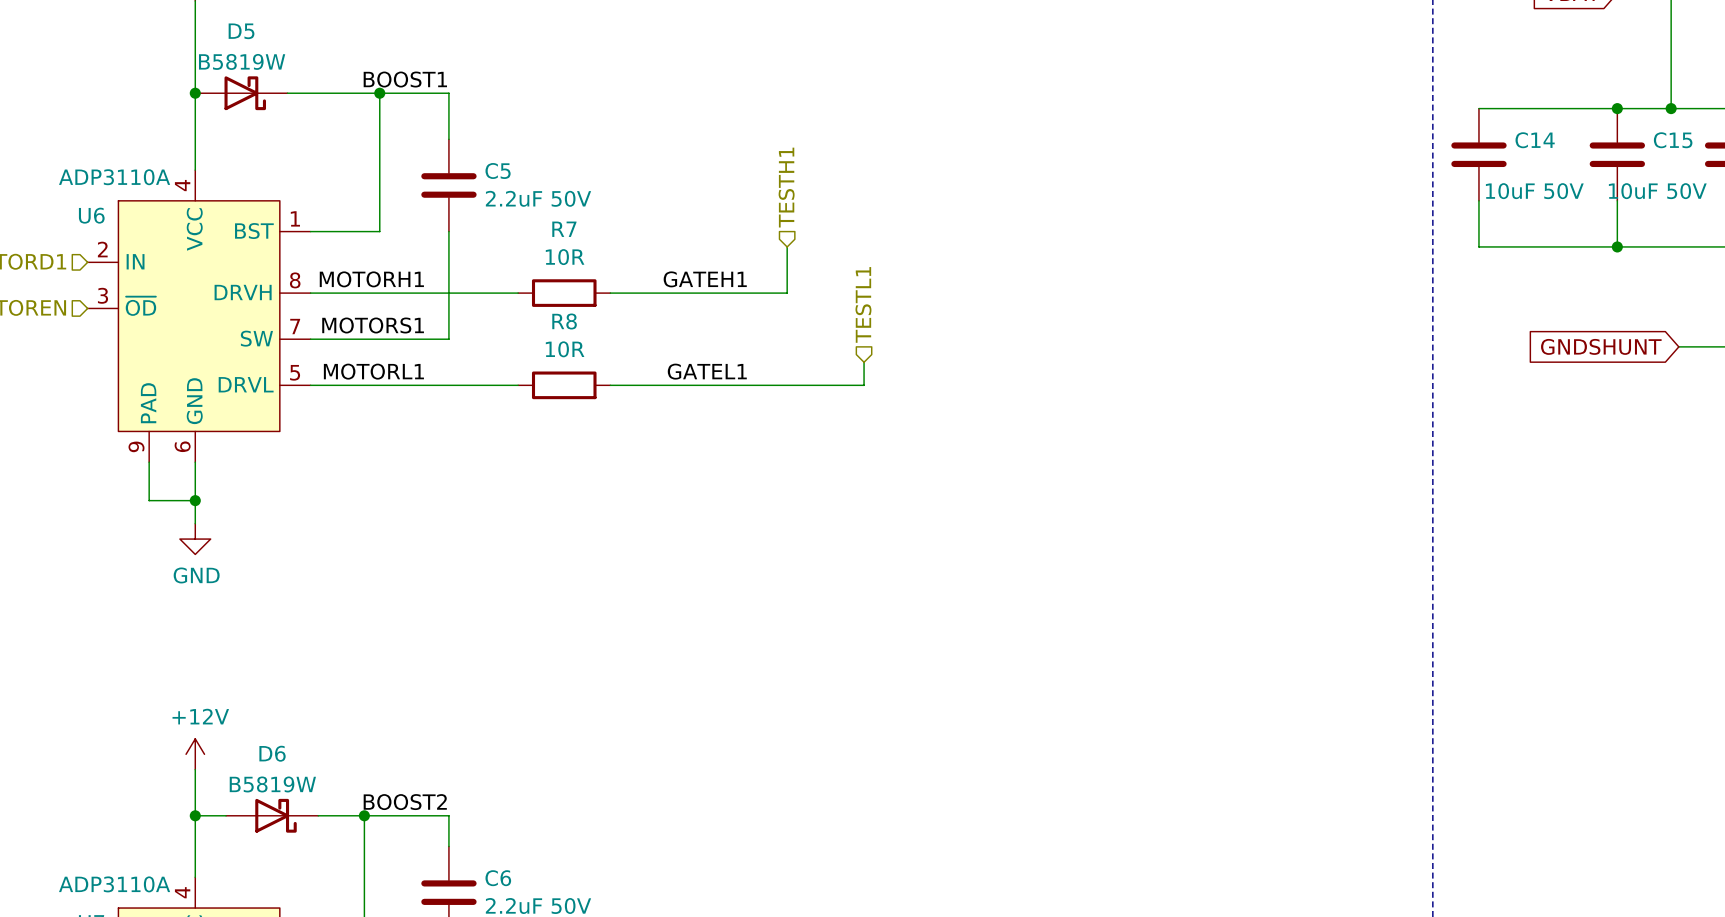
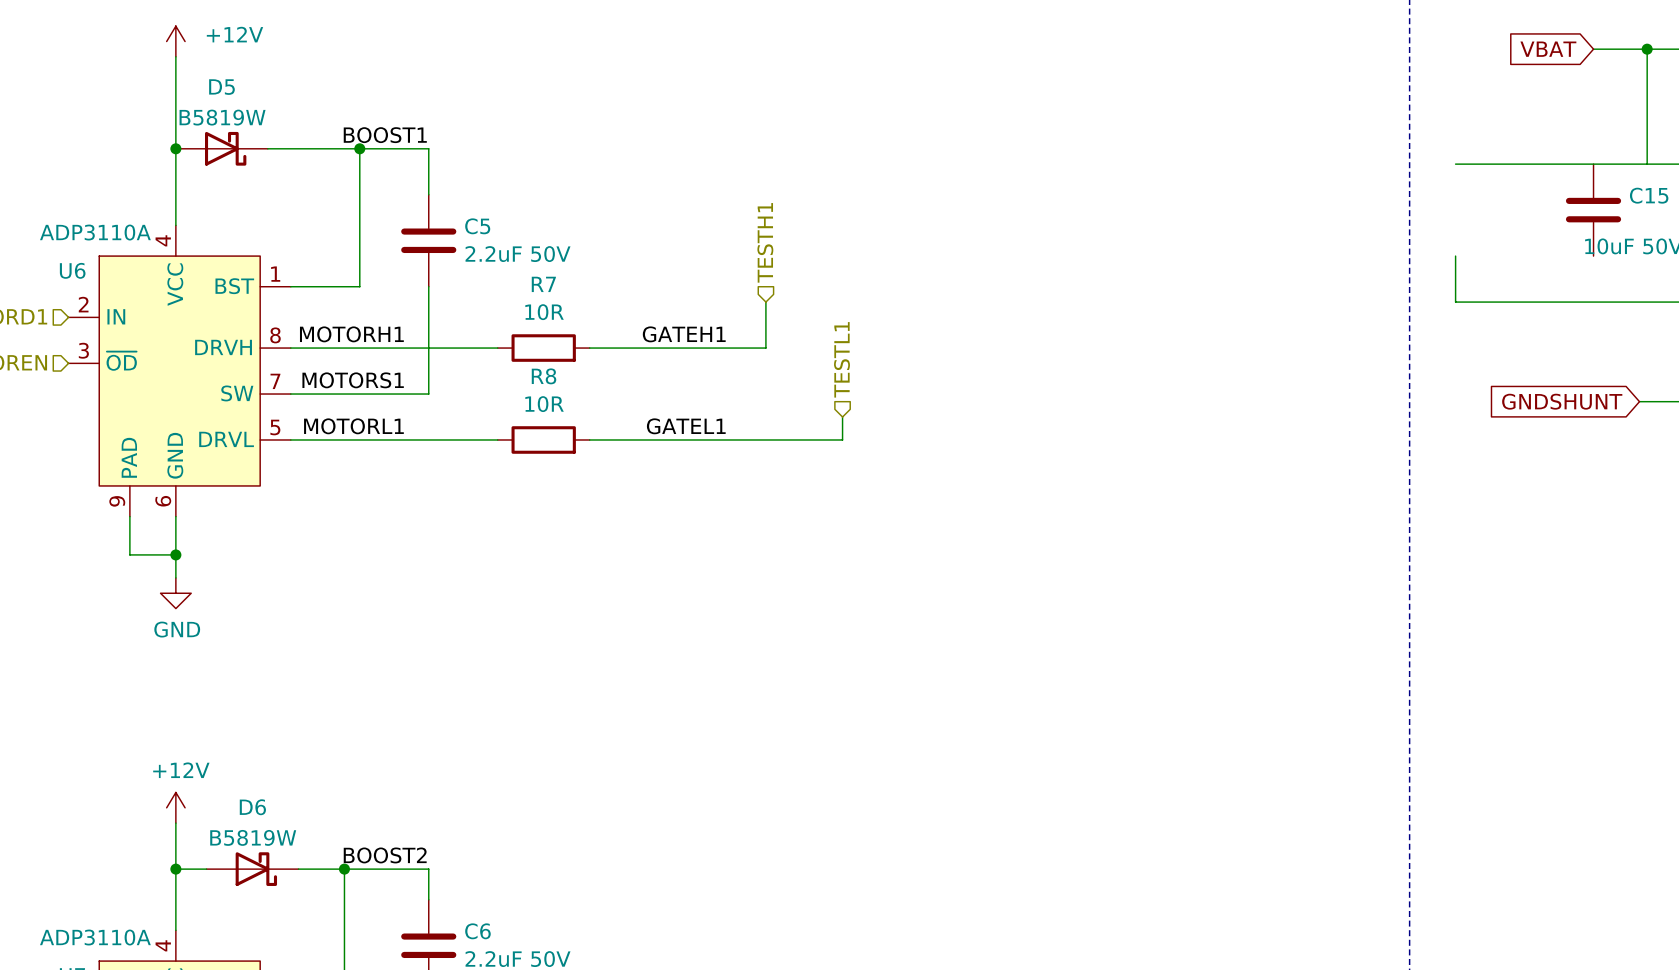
junction: (1617, 108) -> none
junction: (1671, 108) -> none
C14: 10uF 50V (1478, 154) -> none
wire: (1617, 200) (1617, 246) -> none
junction: (1617, 246) -> none
global label position: GNDSHUNT (1601, 346) -> GNDSHUNT (1562, 401)
wire: none -> (1639, 401) (1654, 401)

